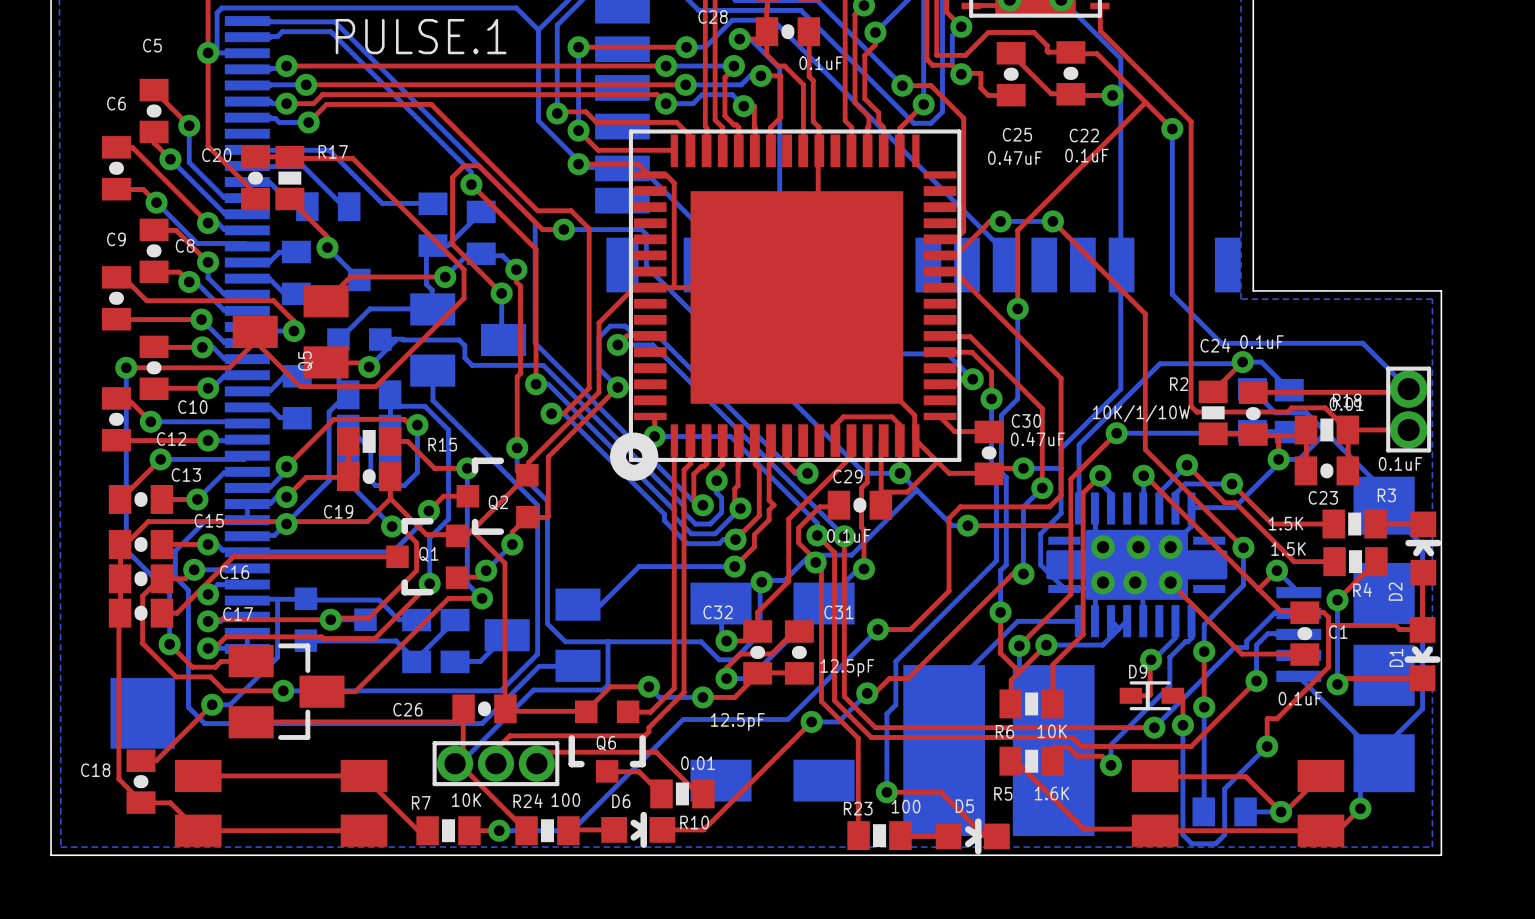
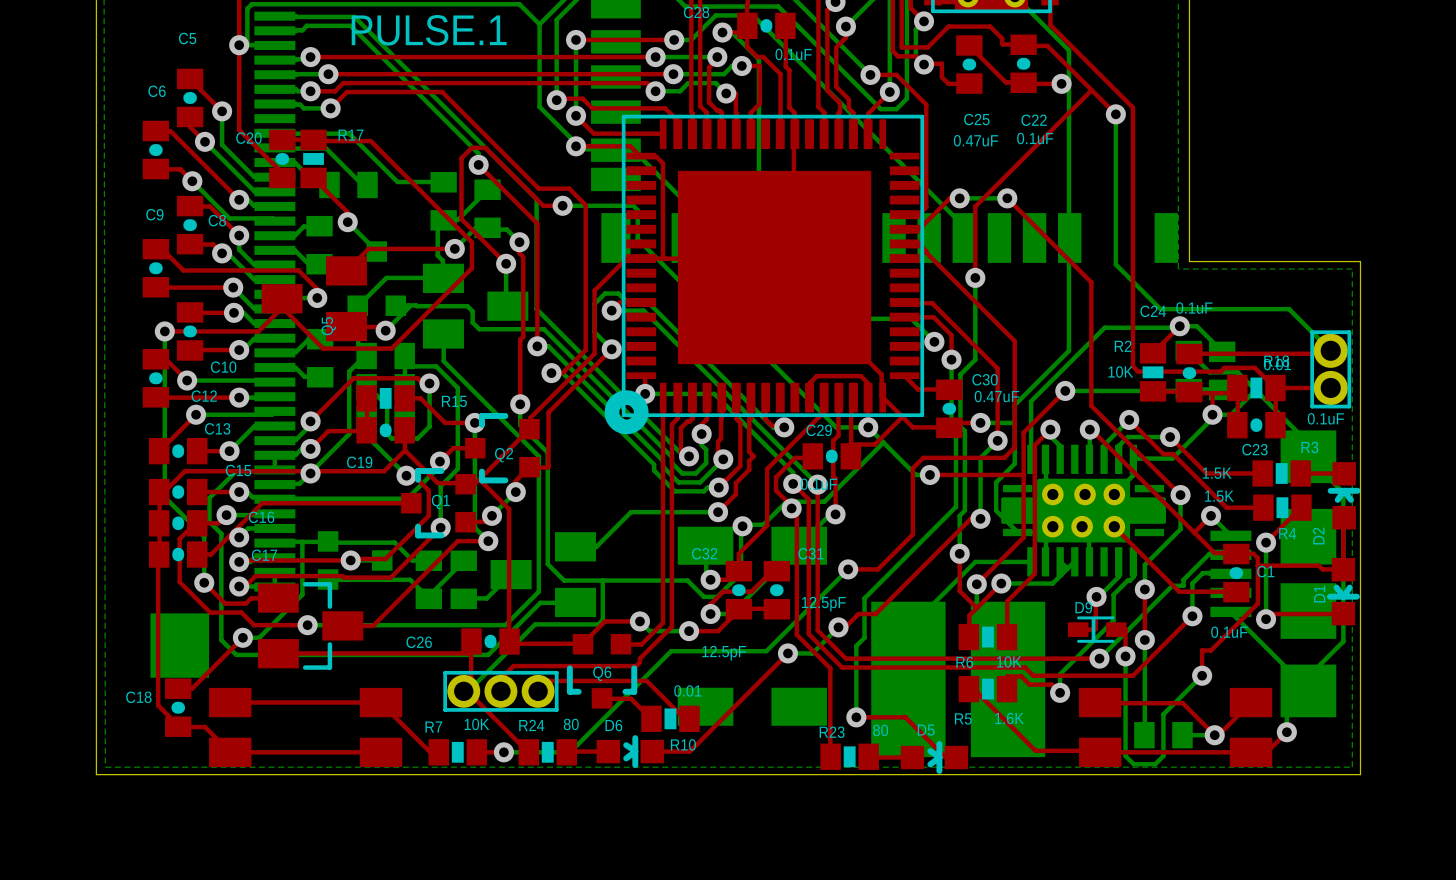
R2 value: 10K/1/10W (1141, 413) -> 10K (1120, 371)
R24 value: 100 (565, 800) -> 80 (571, 724)
R23 value: 100 (906, 806) -> 80 (880, 730)

